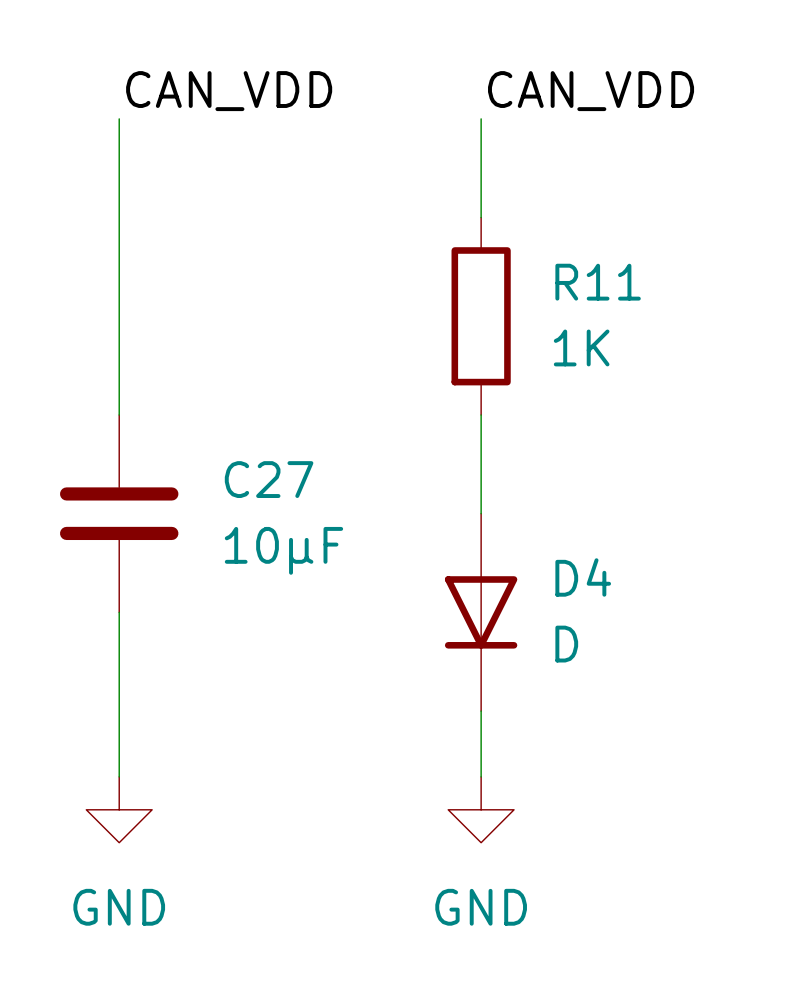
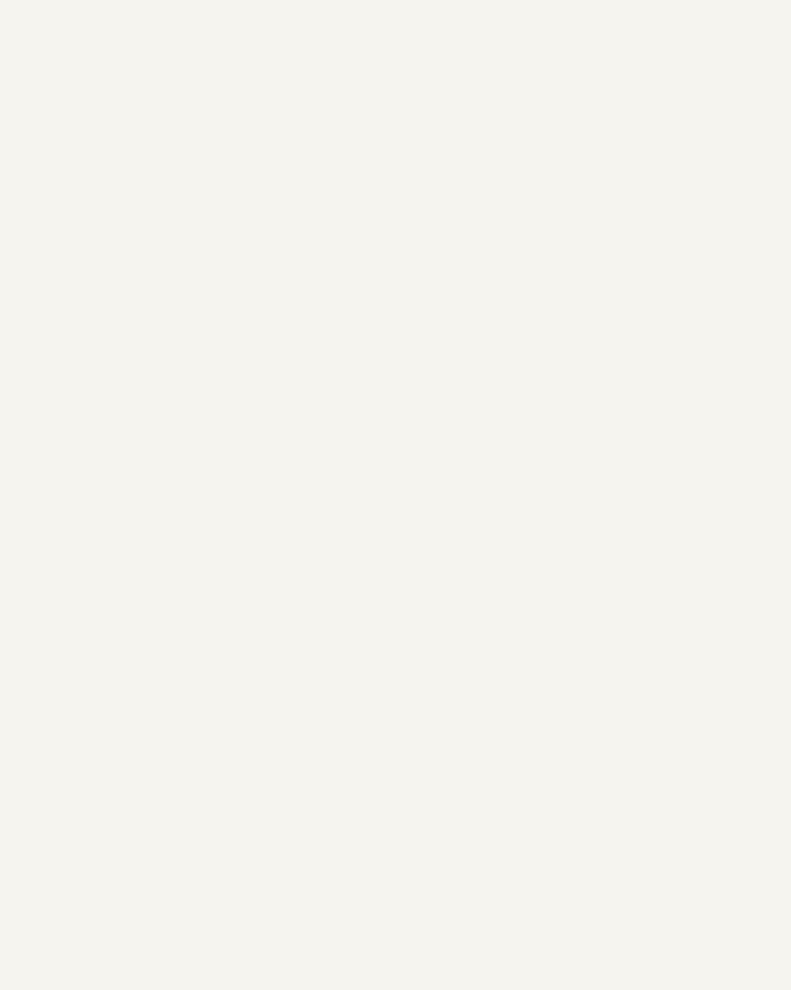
label: CAN_VDD (229, 91) -> none
label: CAN_VDD (591, 91) -> none
wire: (119, 118) (119, 414) -> none
wire: (481, 118) (481, 217) -> none
R11: 1K (481, 316) -> none
wire: (481, 414) (481, 513) -> none
C27: 10μF (119, 513) -> none
wire: (119, 612) (119, 776) -> none
D4: D (481, 612) -> none
wire: (481, 711) (481, 776) -> none
power symbol: GND (119, 809) -> none
power symbol: GND (481, 809) -> none

